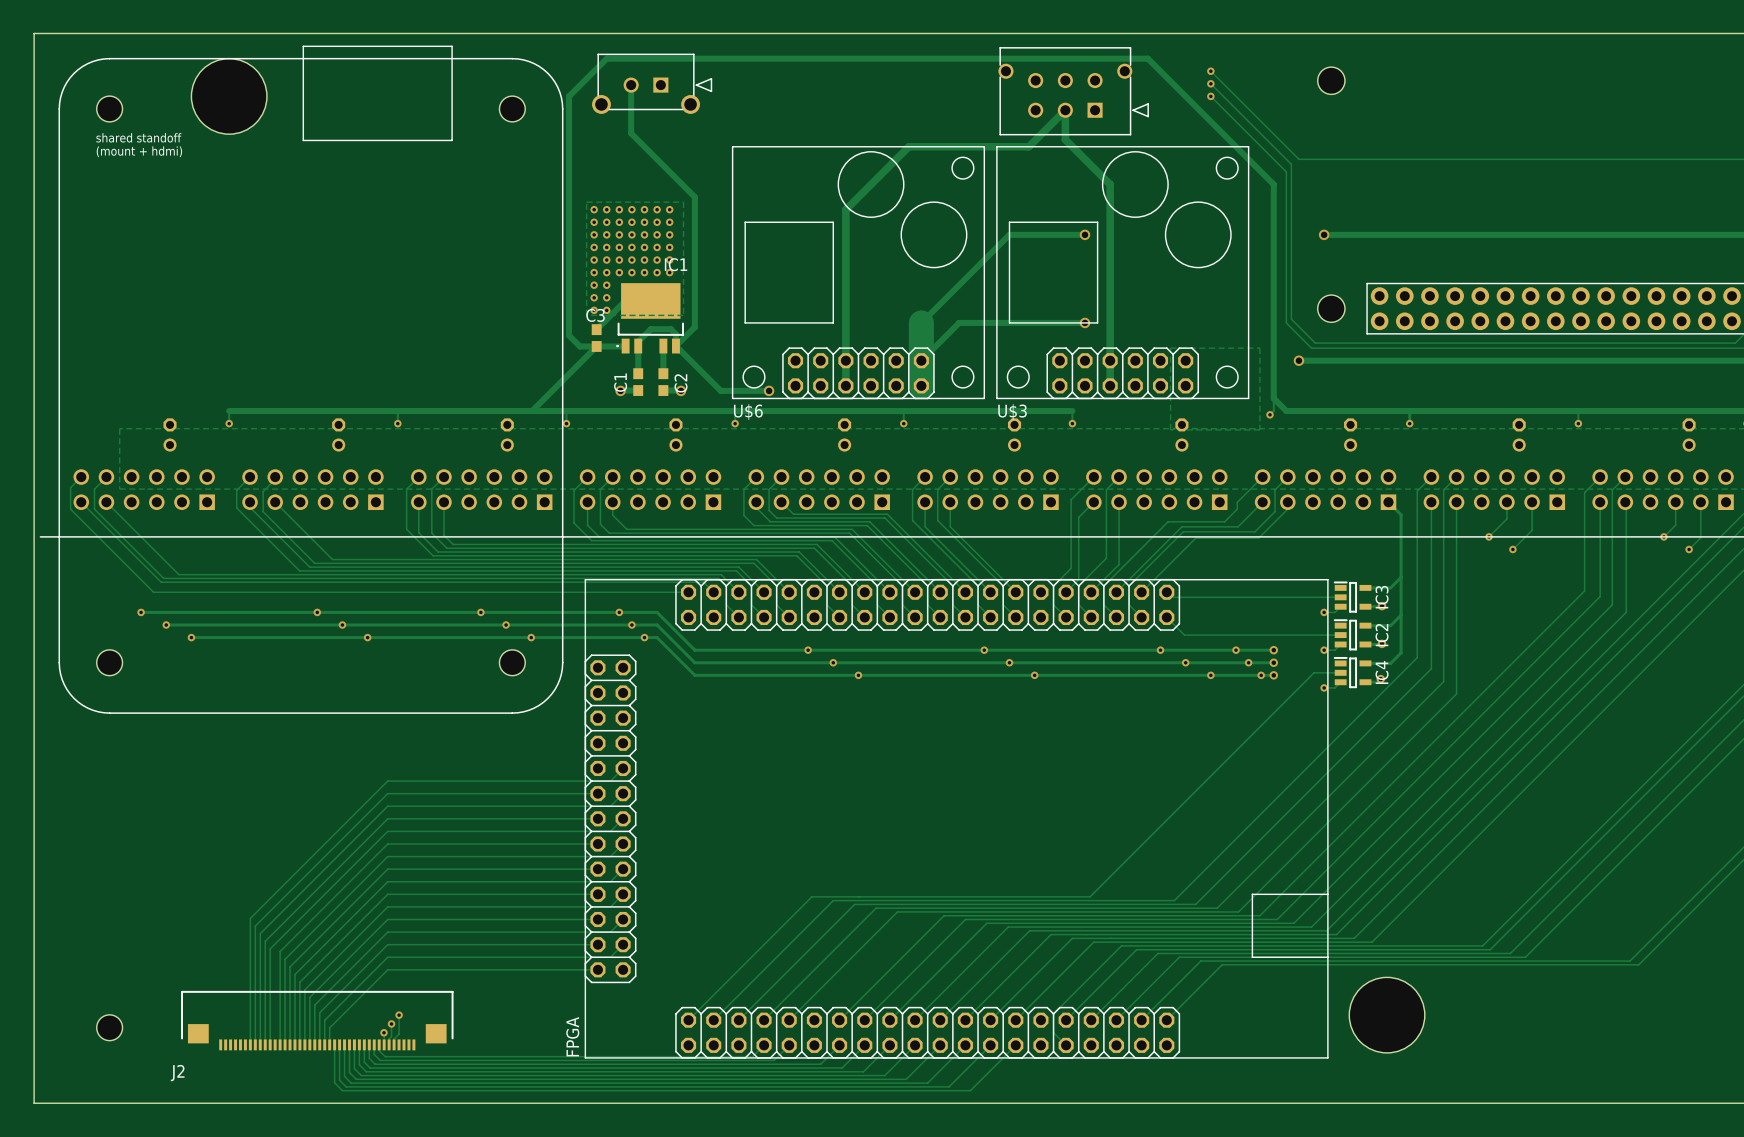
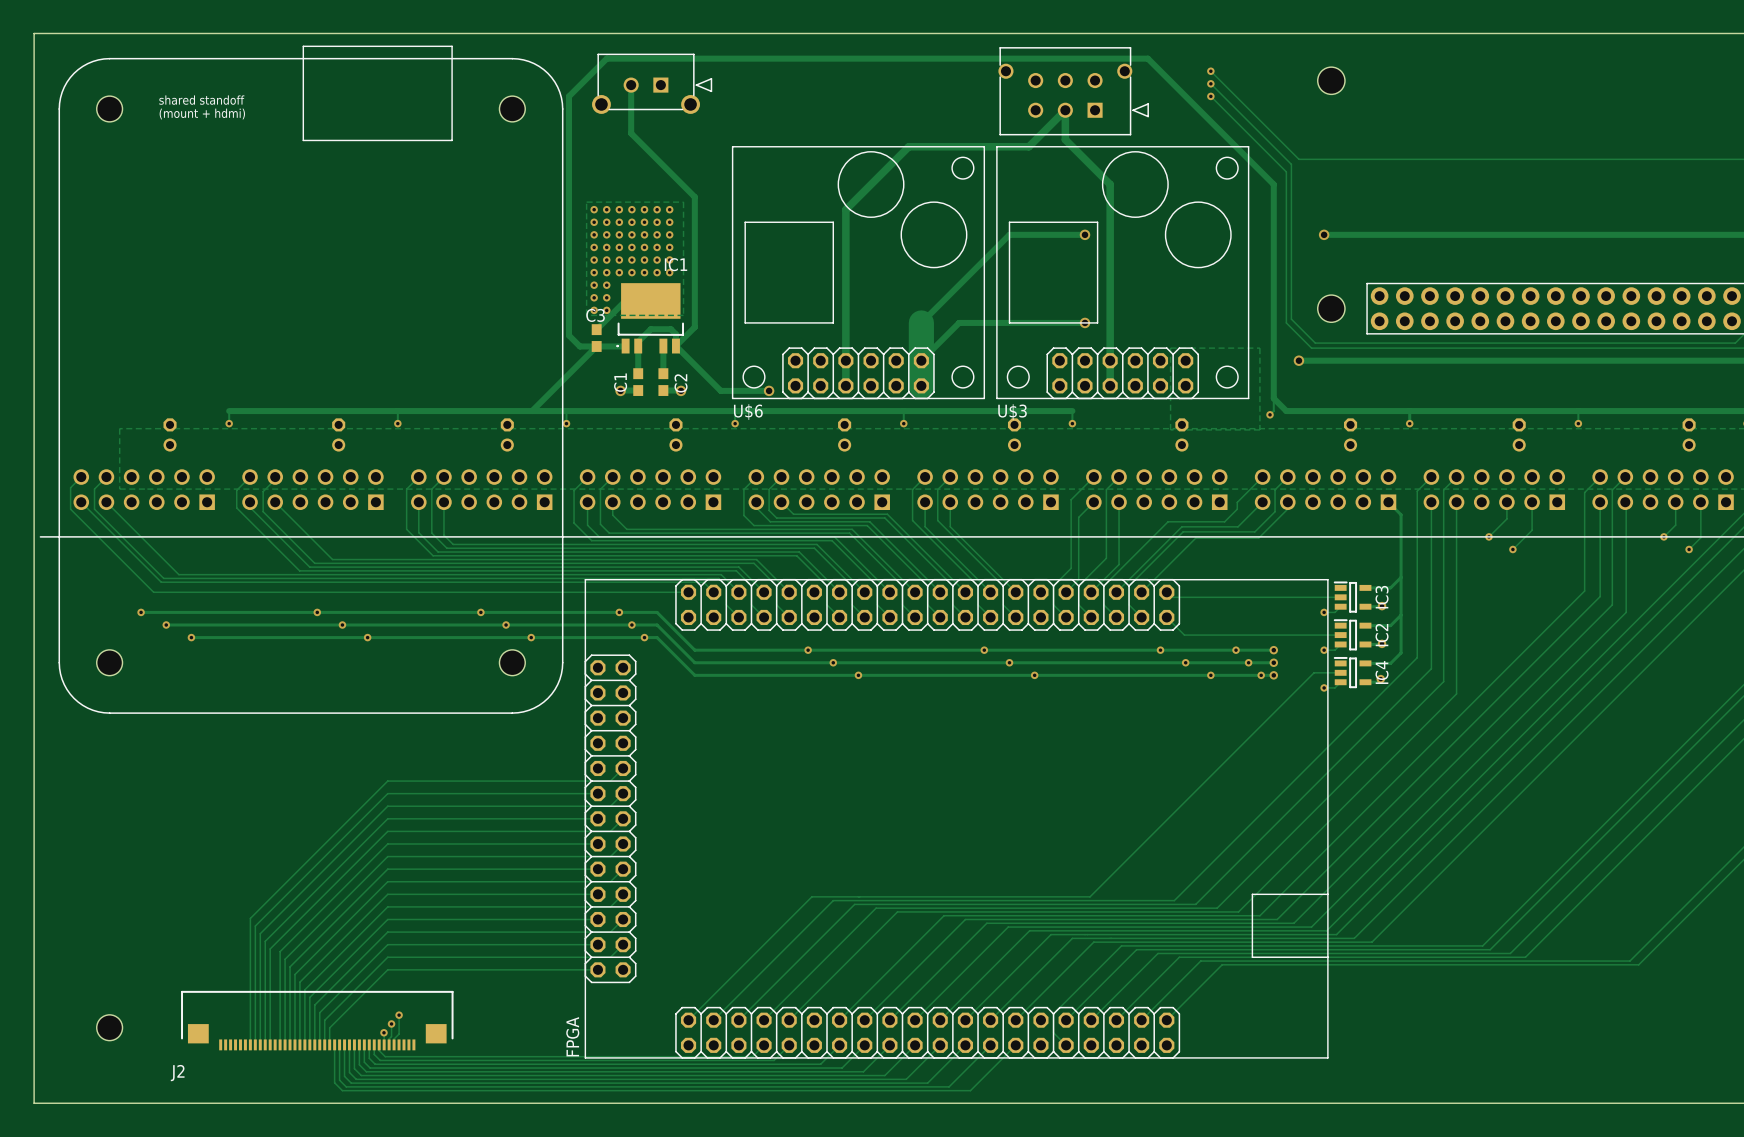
hole: (229, 96) -> none
text position: shared standoff (138, 137) -> shared standoff (201, 100)
text position: (mount + hdmi) (139, 151) -> (mount + hdmi) (202, 114)
hole: (1387, 1015) -> none

